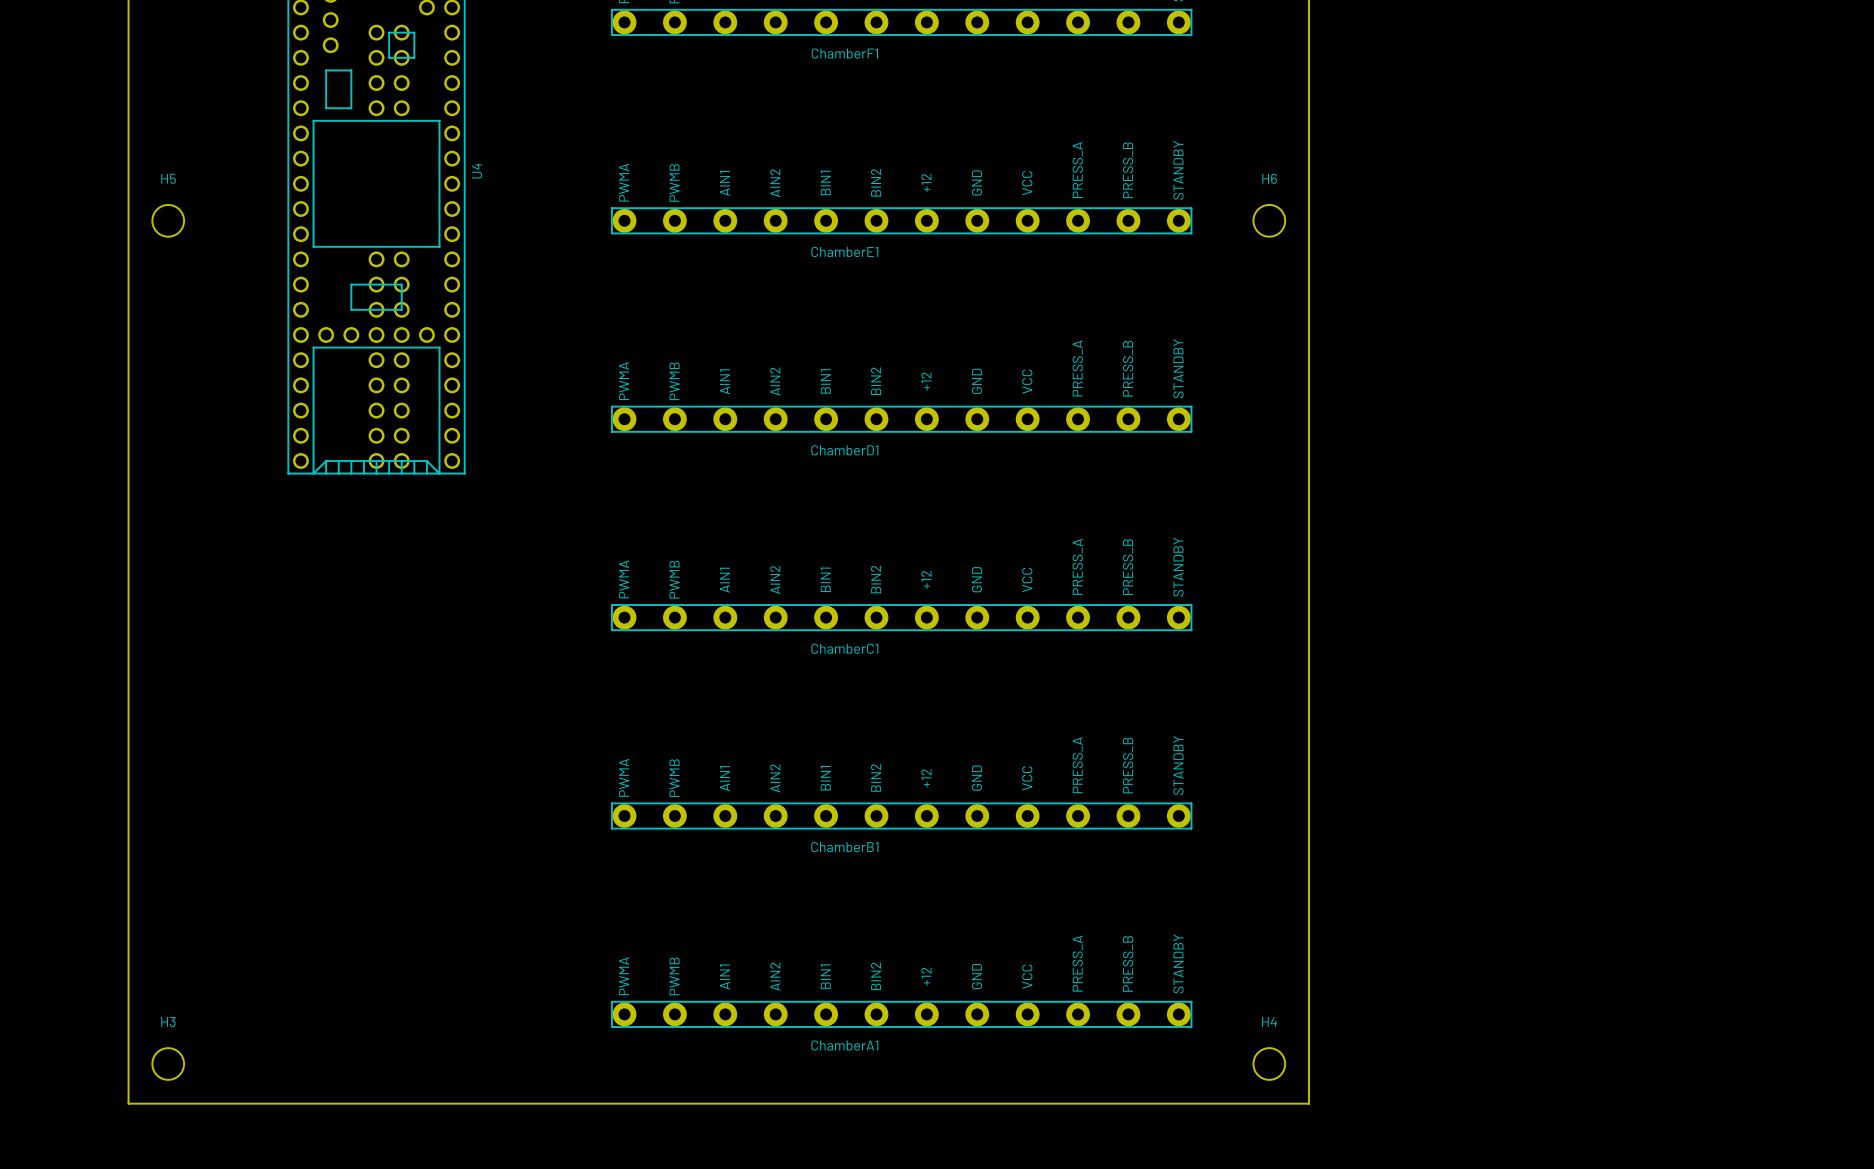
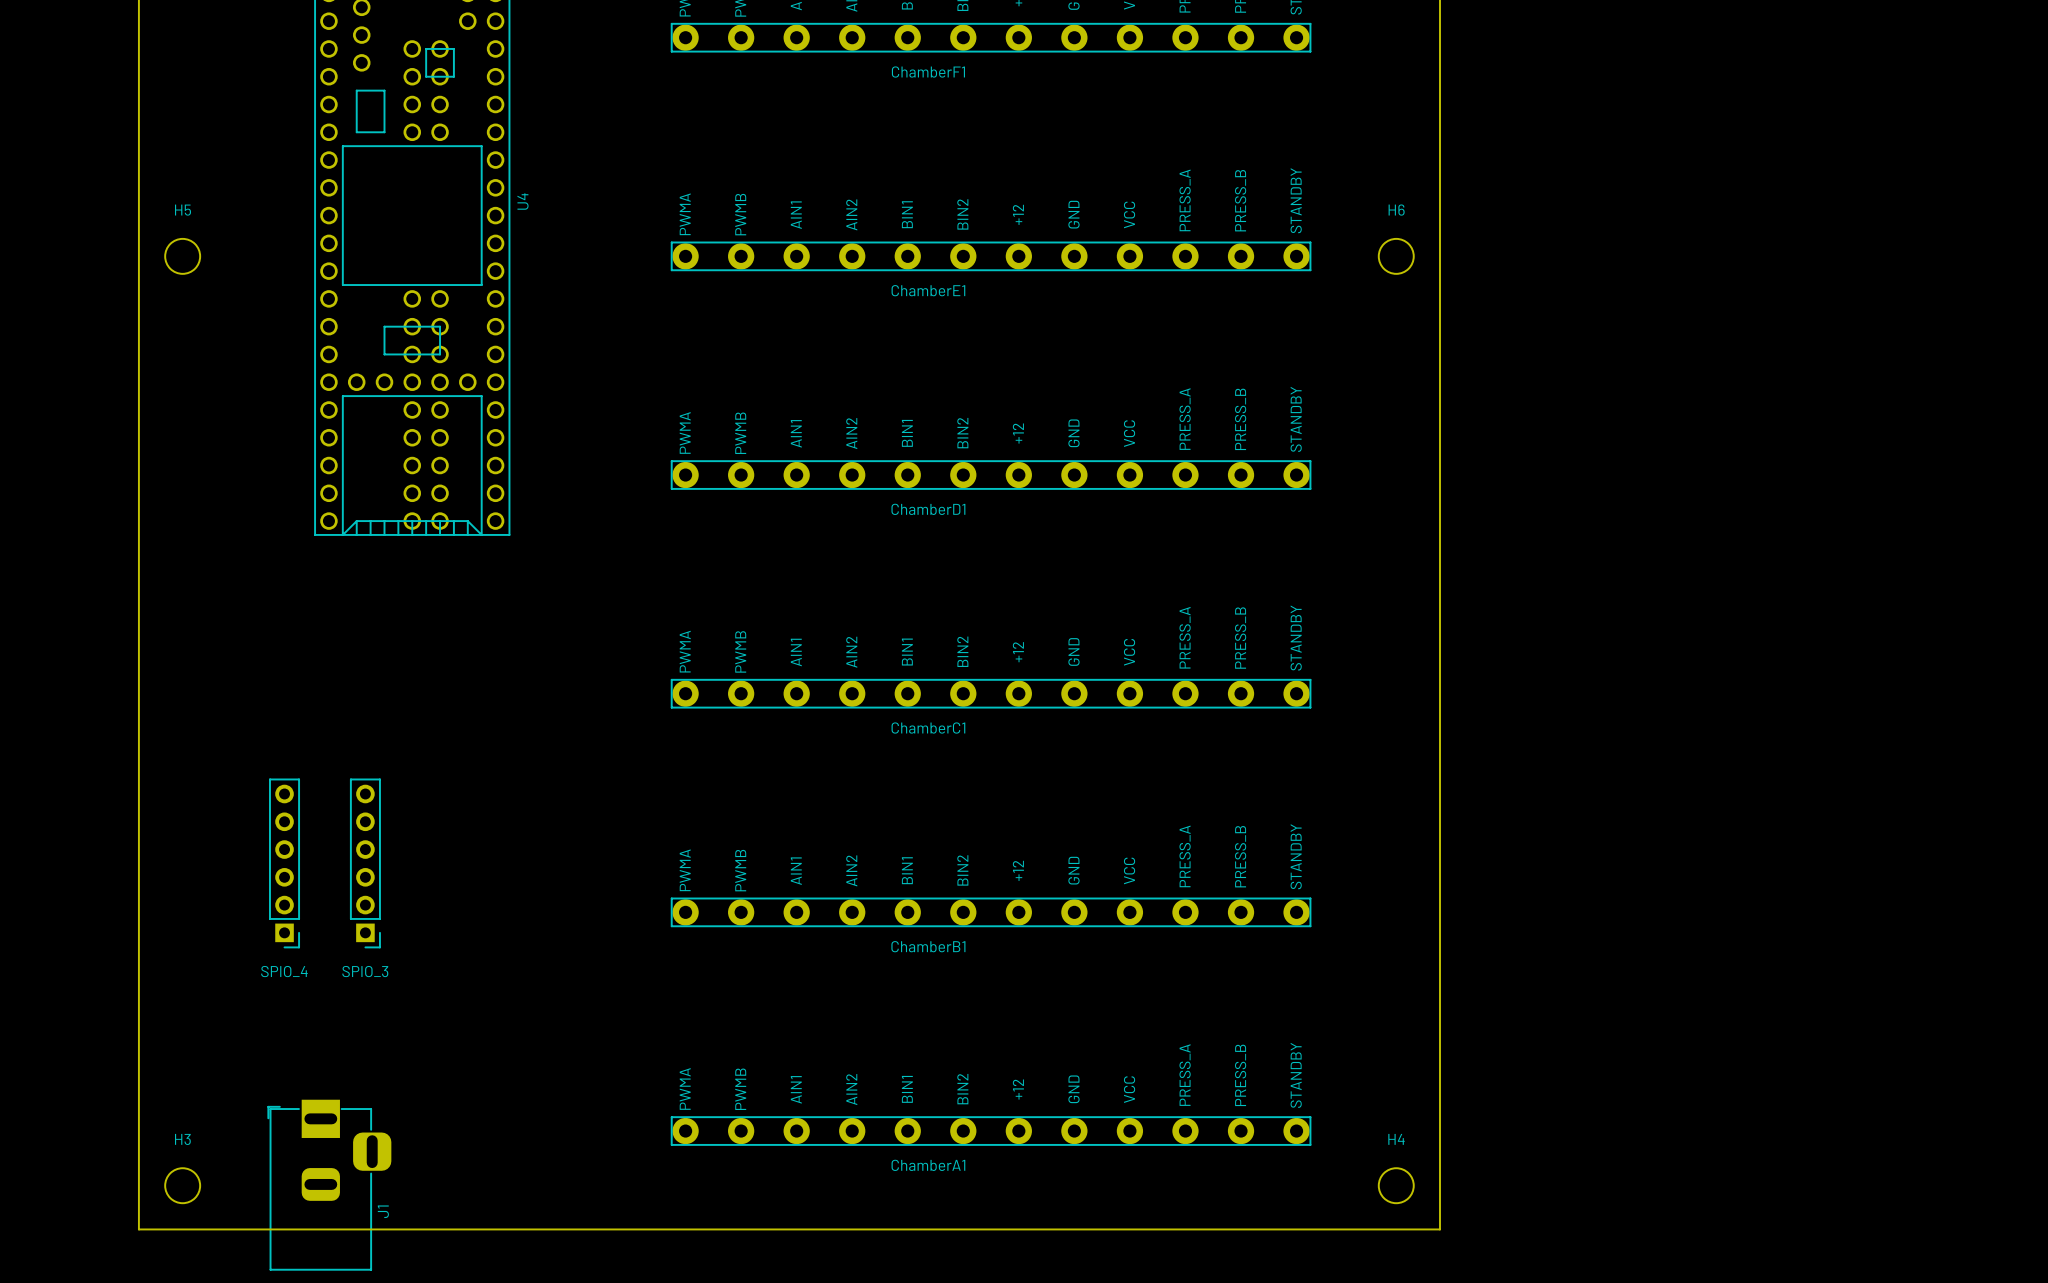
SPIO_4: none -> (284, 863)
SPIO_3: none -> (365, 863)
J1: none -> (329, 1185)

